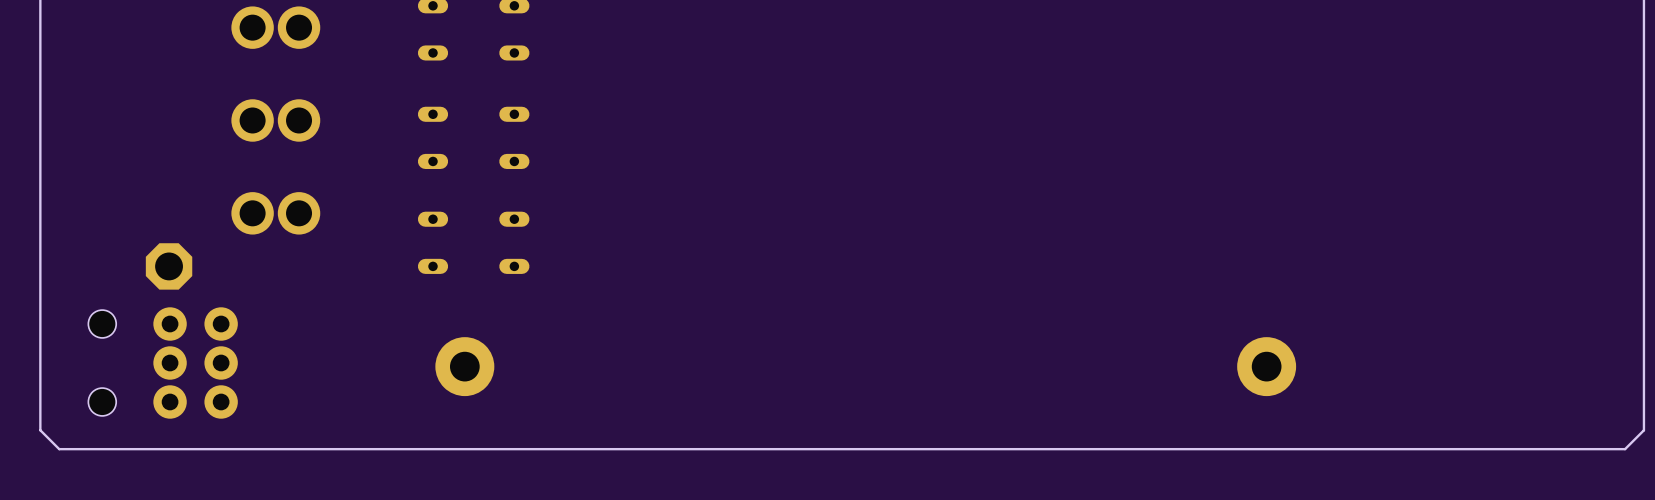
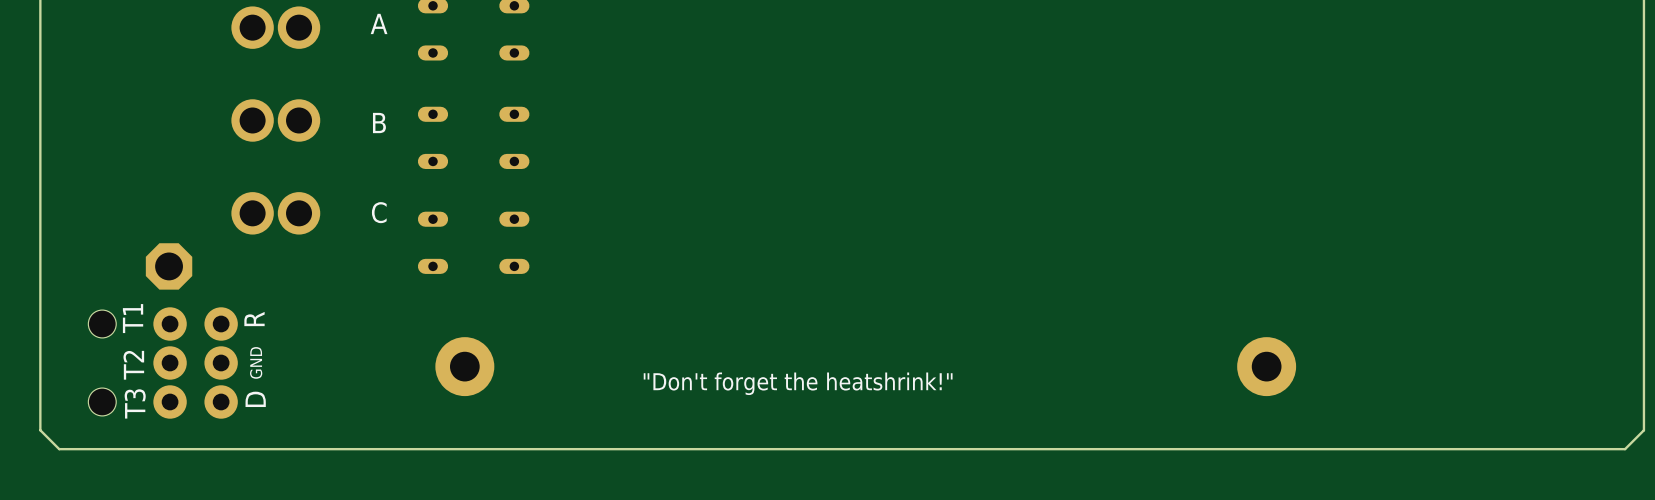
text: none -> A (379, 23)
text: none -> B (379, 123)
text: none -> C (379, 212)
text: none -> T1 (133, 318)
text: none -> R (254, 319)
text: none -> T2 (133, 365)
text: none -> GND (256, 362)
text: none -> "Don't forget the heatshrink!" (798, 383)
text: none -> D (255, 399)
text: none -> T3 (135, 403)

